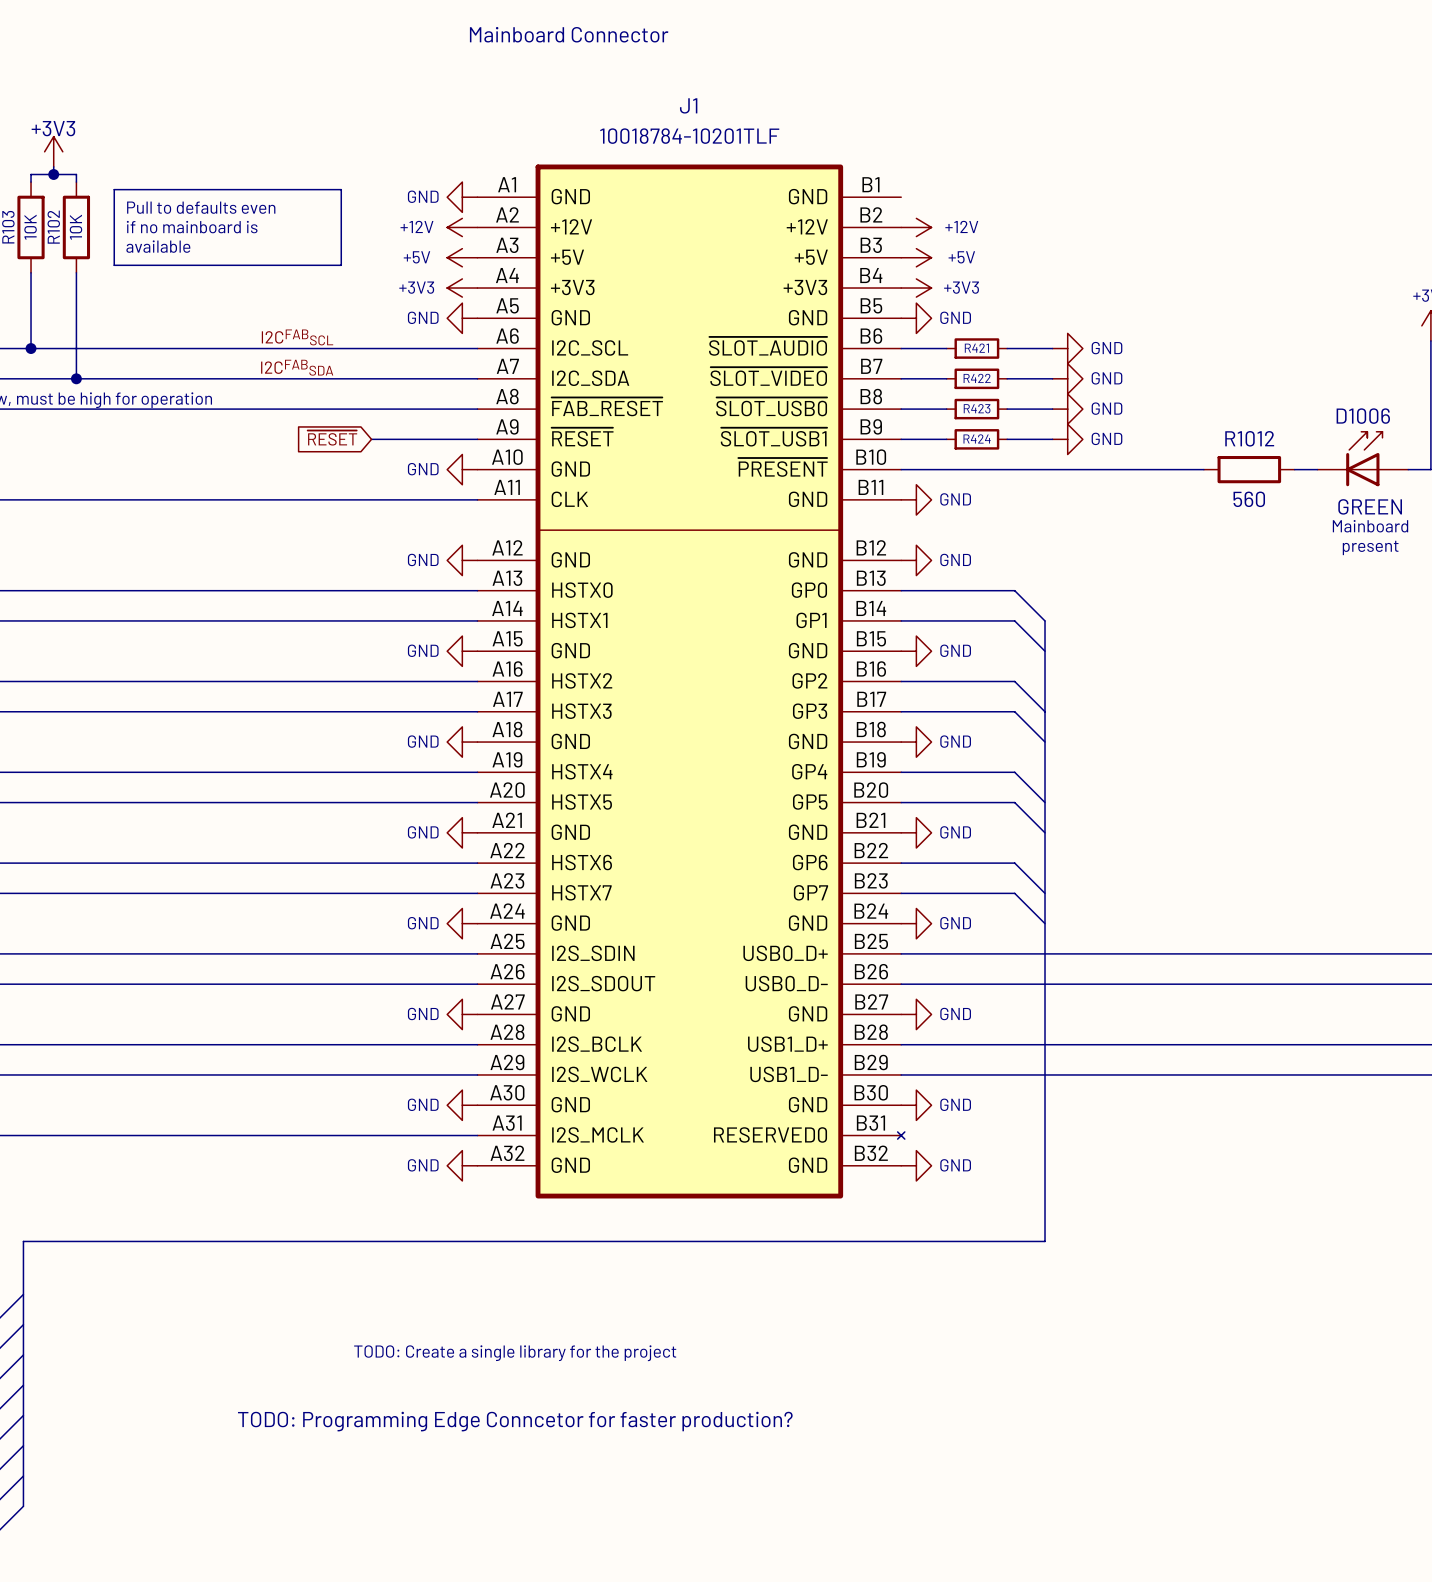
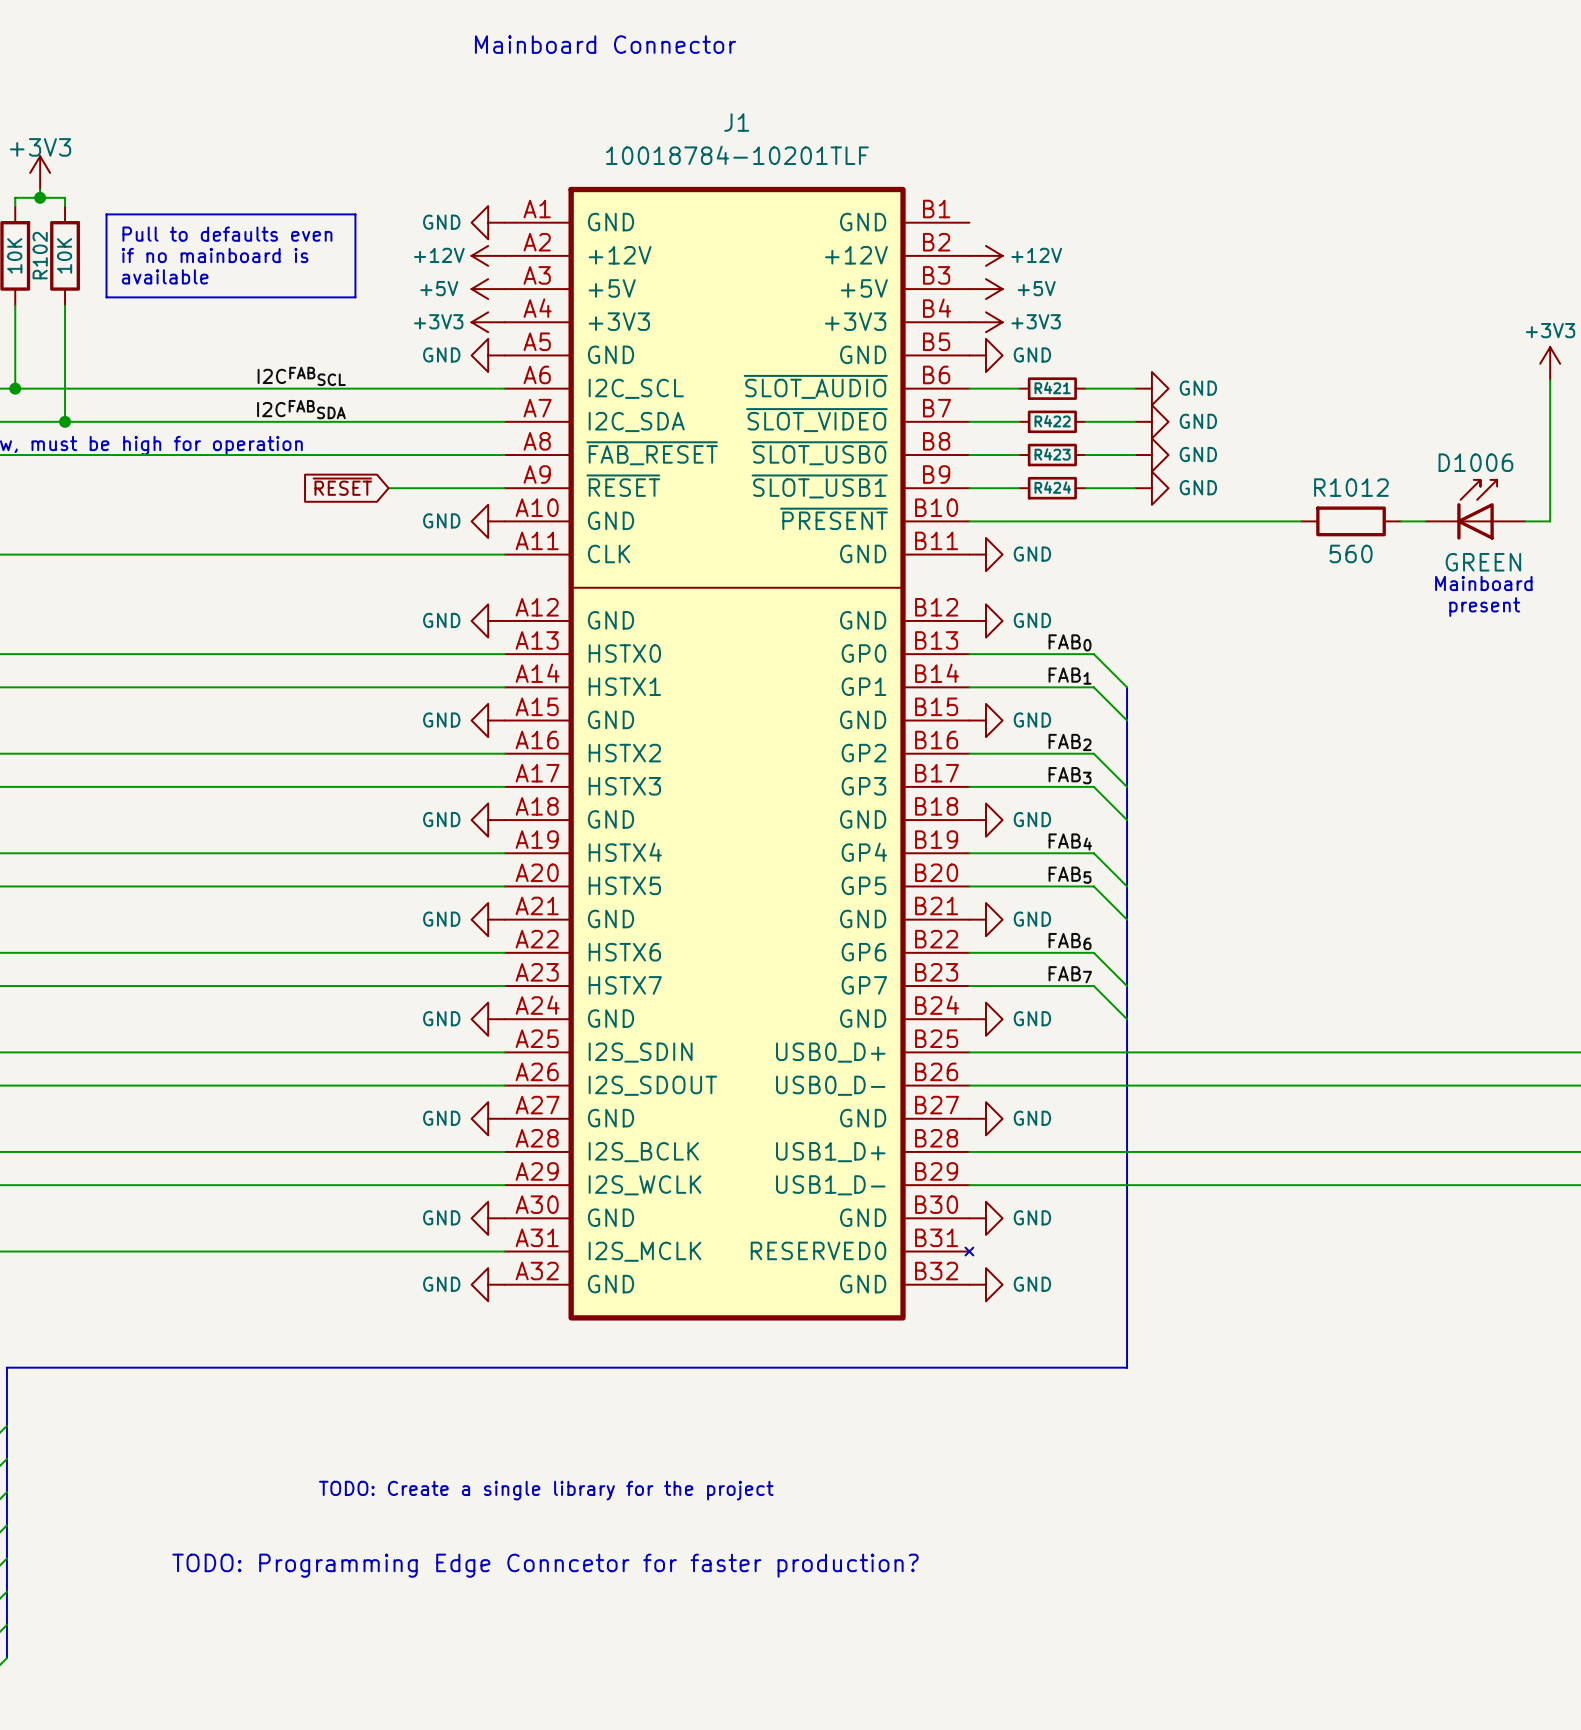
label: none -> FAB0 (1070, 642)
label: none -> FAB1 (1070, 676)
label: none -> FAB2 (1070, 742)
label: none -> FAB3 (1070, 775)
label: none -> FAB4 (1070, 842)
label: none -> FAB5 (1070, 875)
label: none -> FAB6 (1070, 941)
label: none -> FAB7 (1070, 974)

